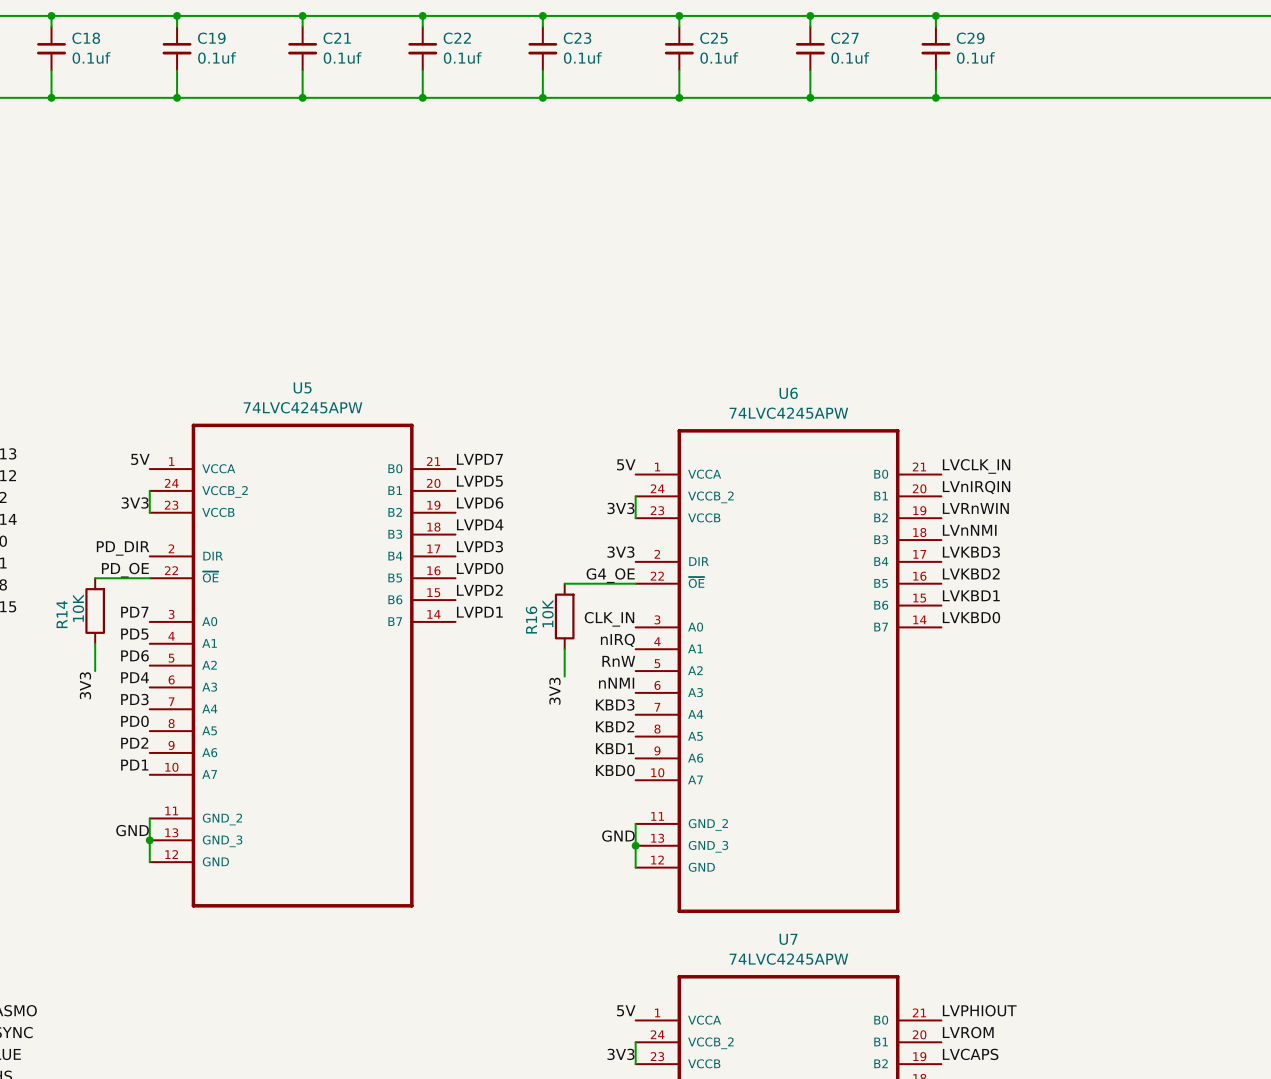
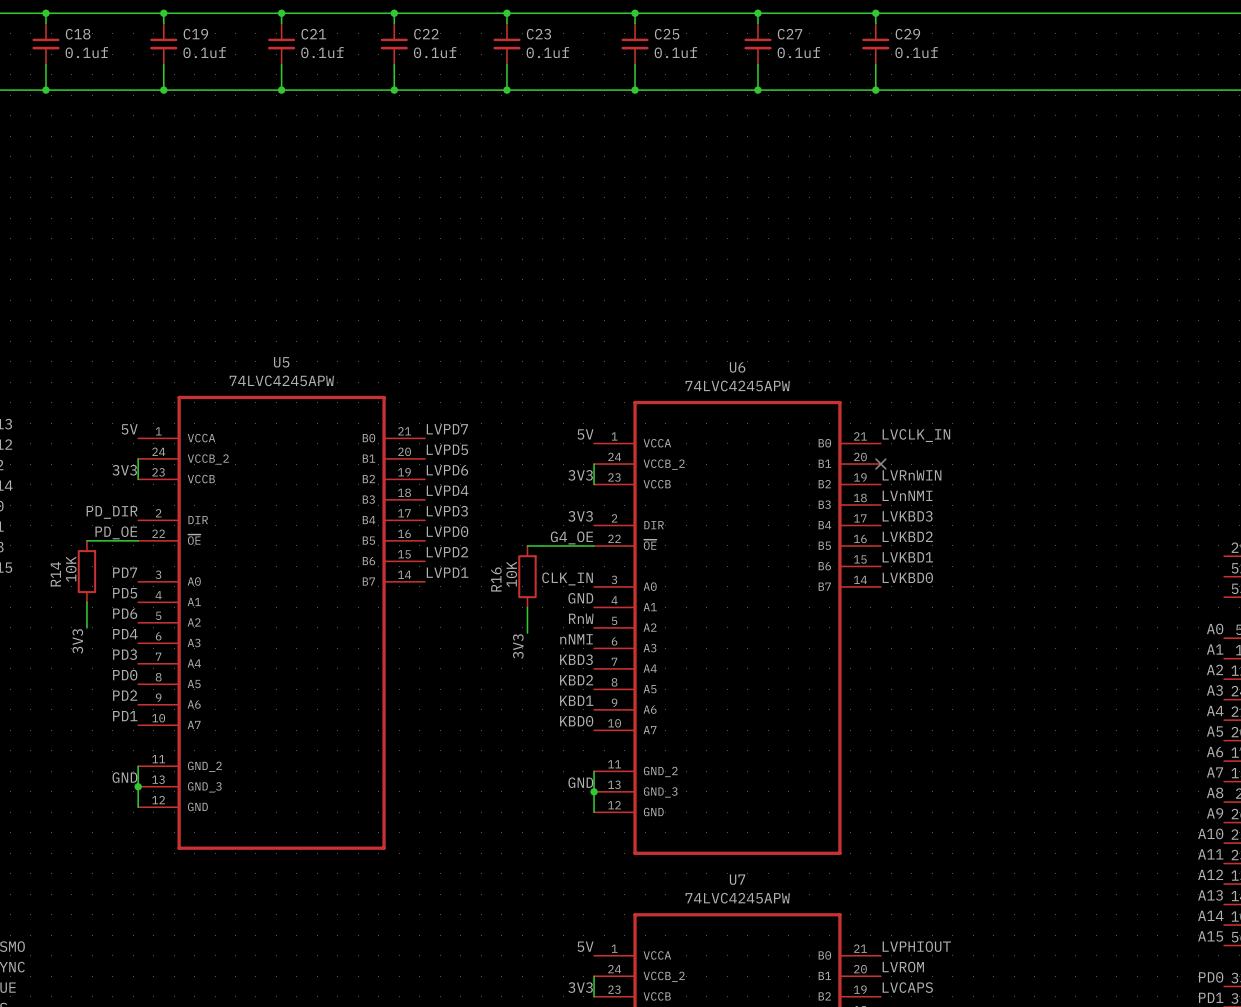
label: LVnIRQIN (976, 487) -> none
no-connect mark: none -> (880, 464)
label: nIRQ (617, 640) -> GND (580, 598)

